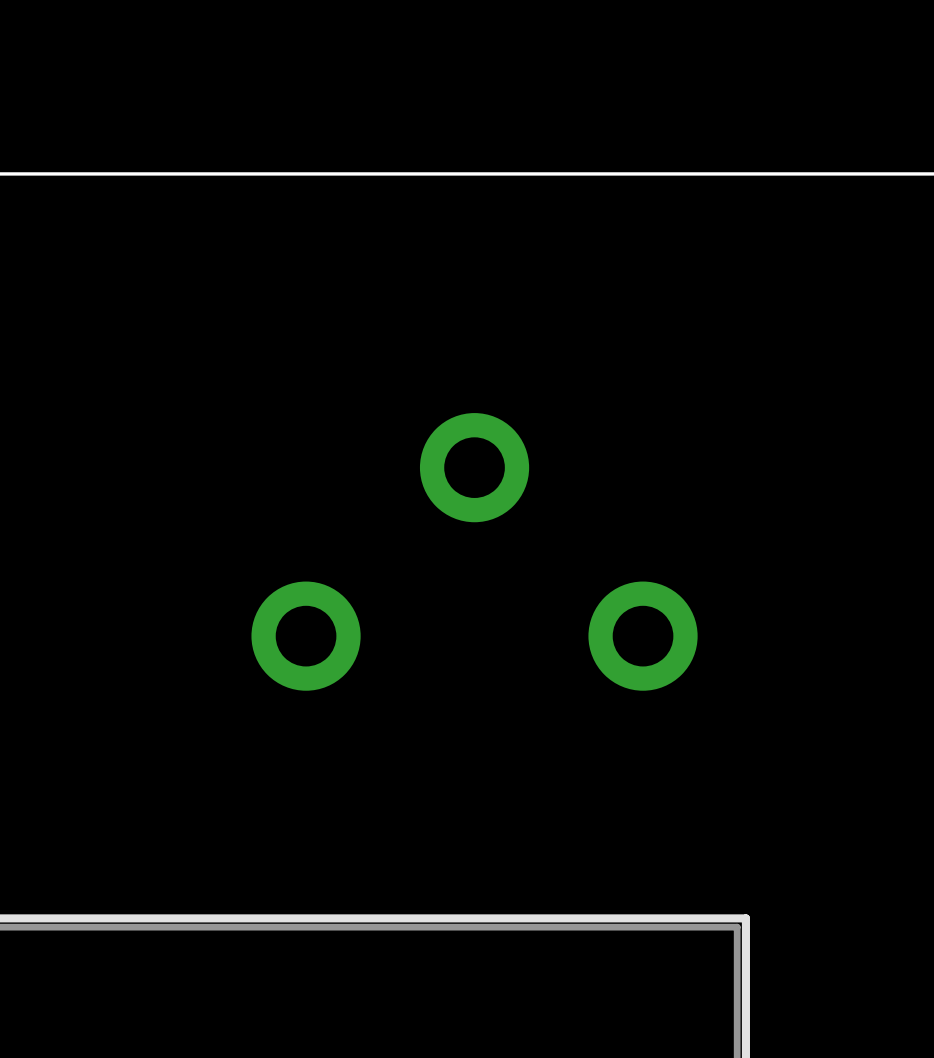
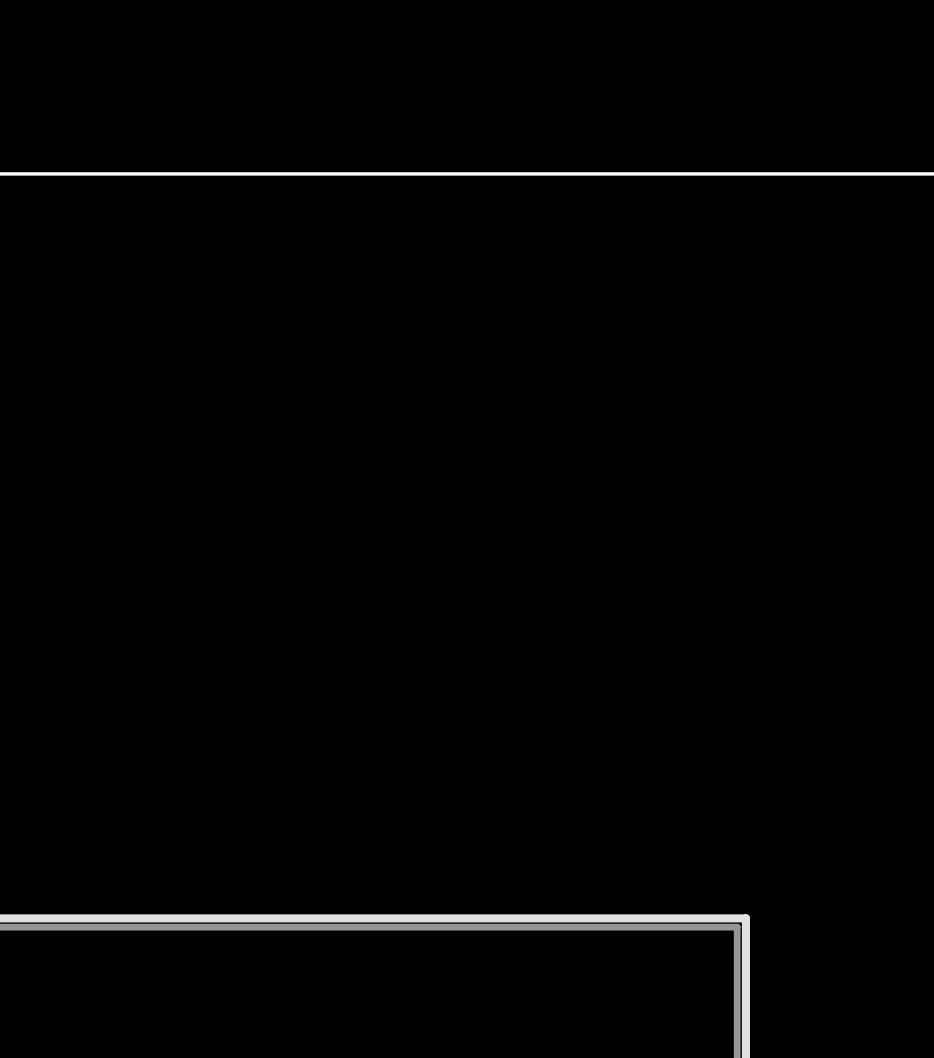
part: (474, 551) -> none

